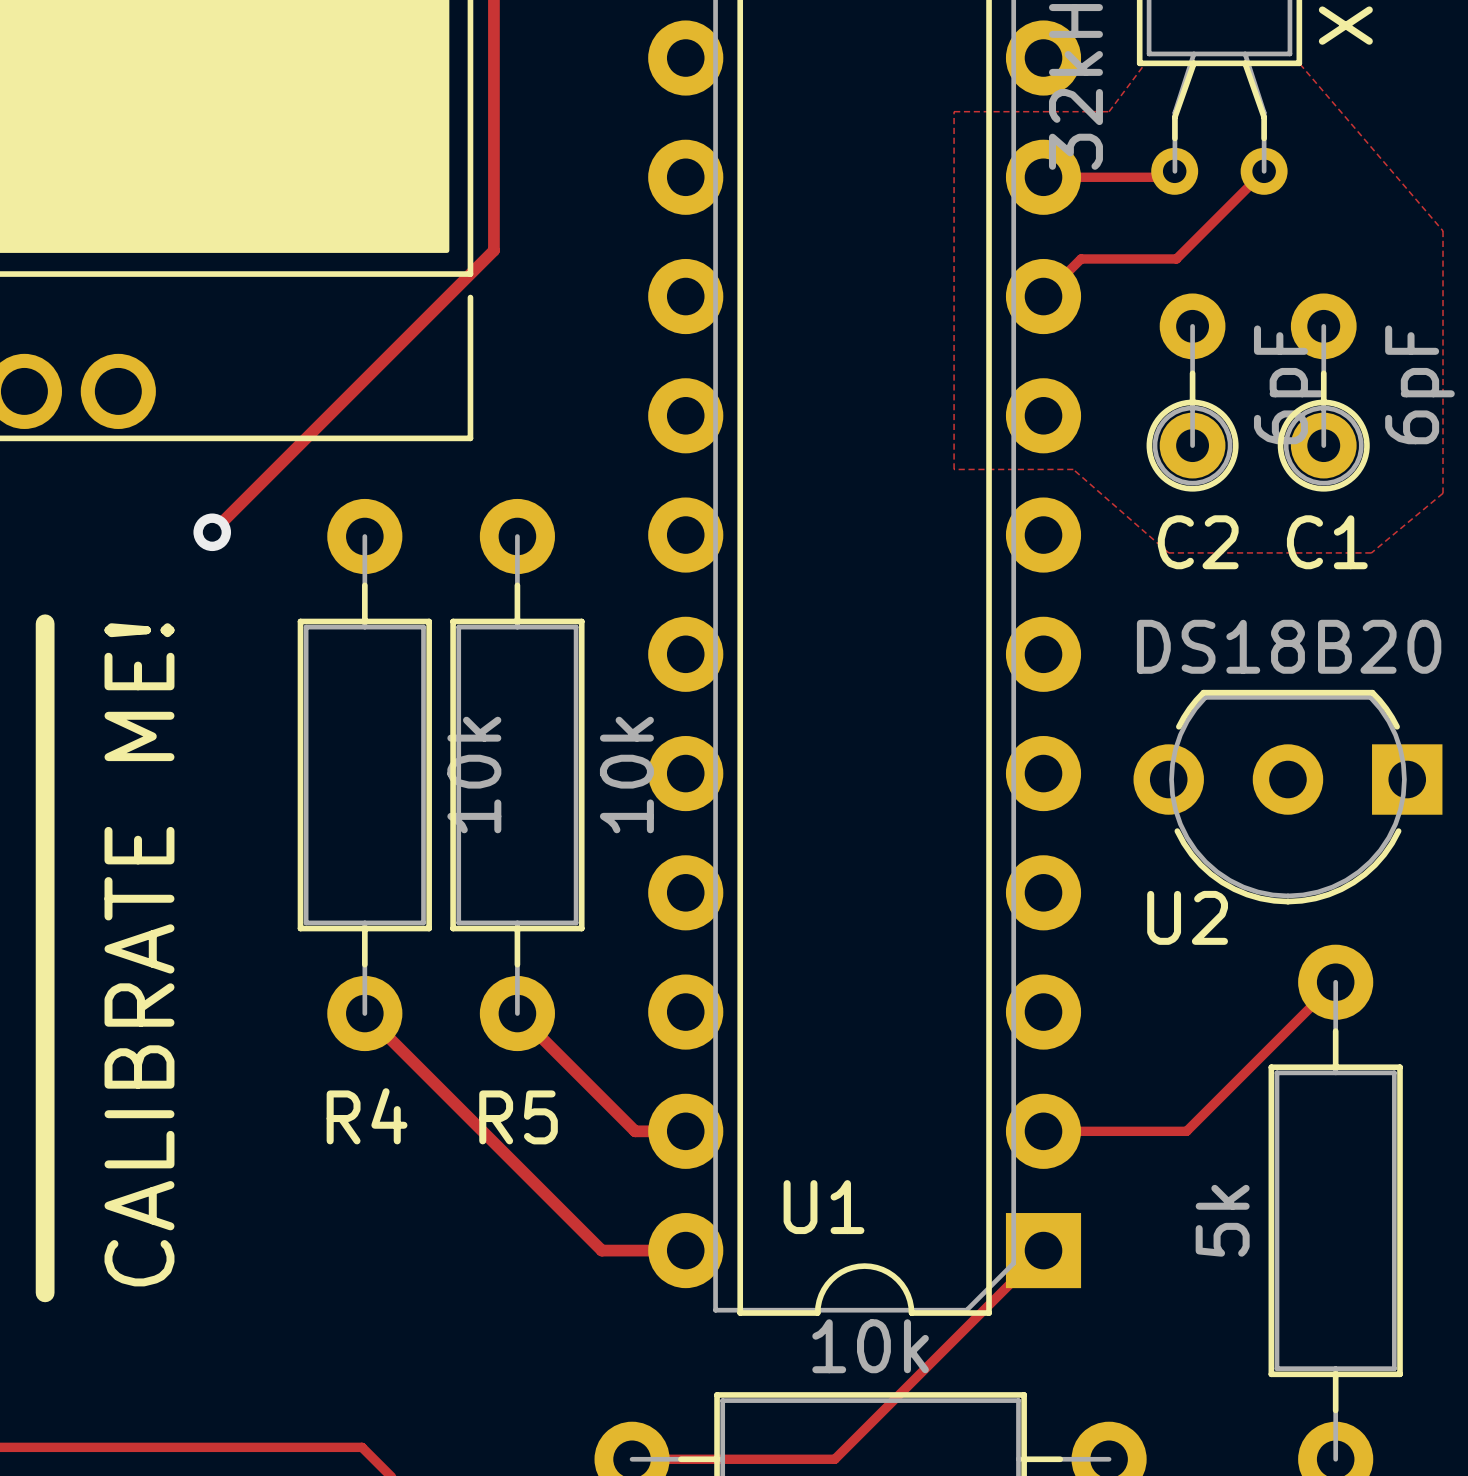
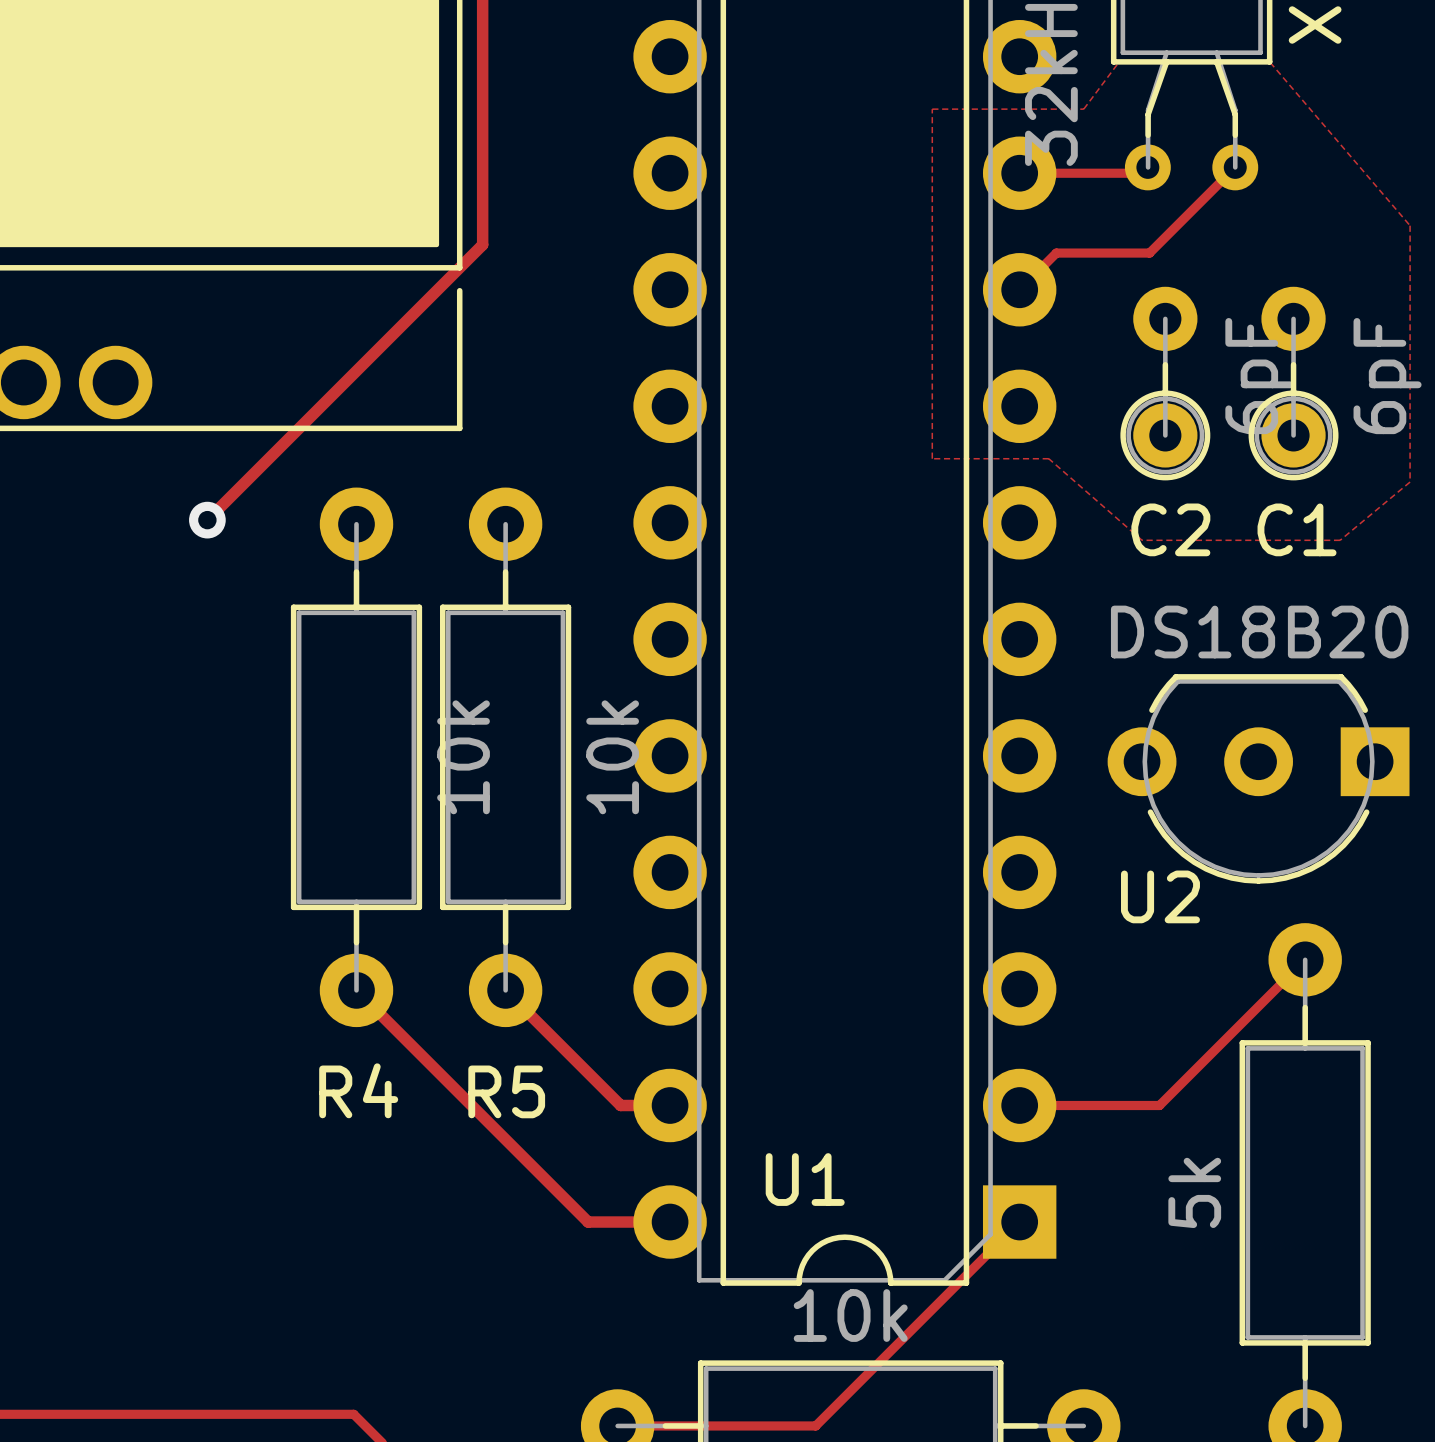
line: (45, 623) (45, 1292) -> none
text: CALIBRATE ME! (139, 954) -> none

